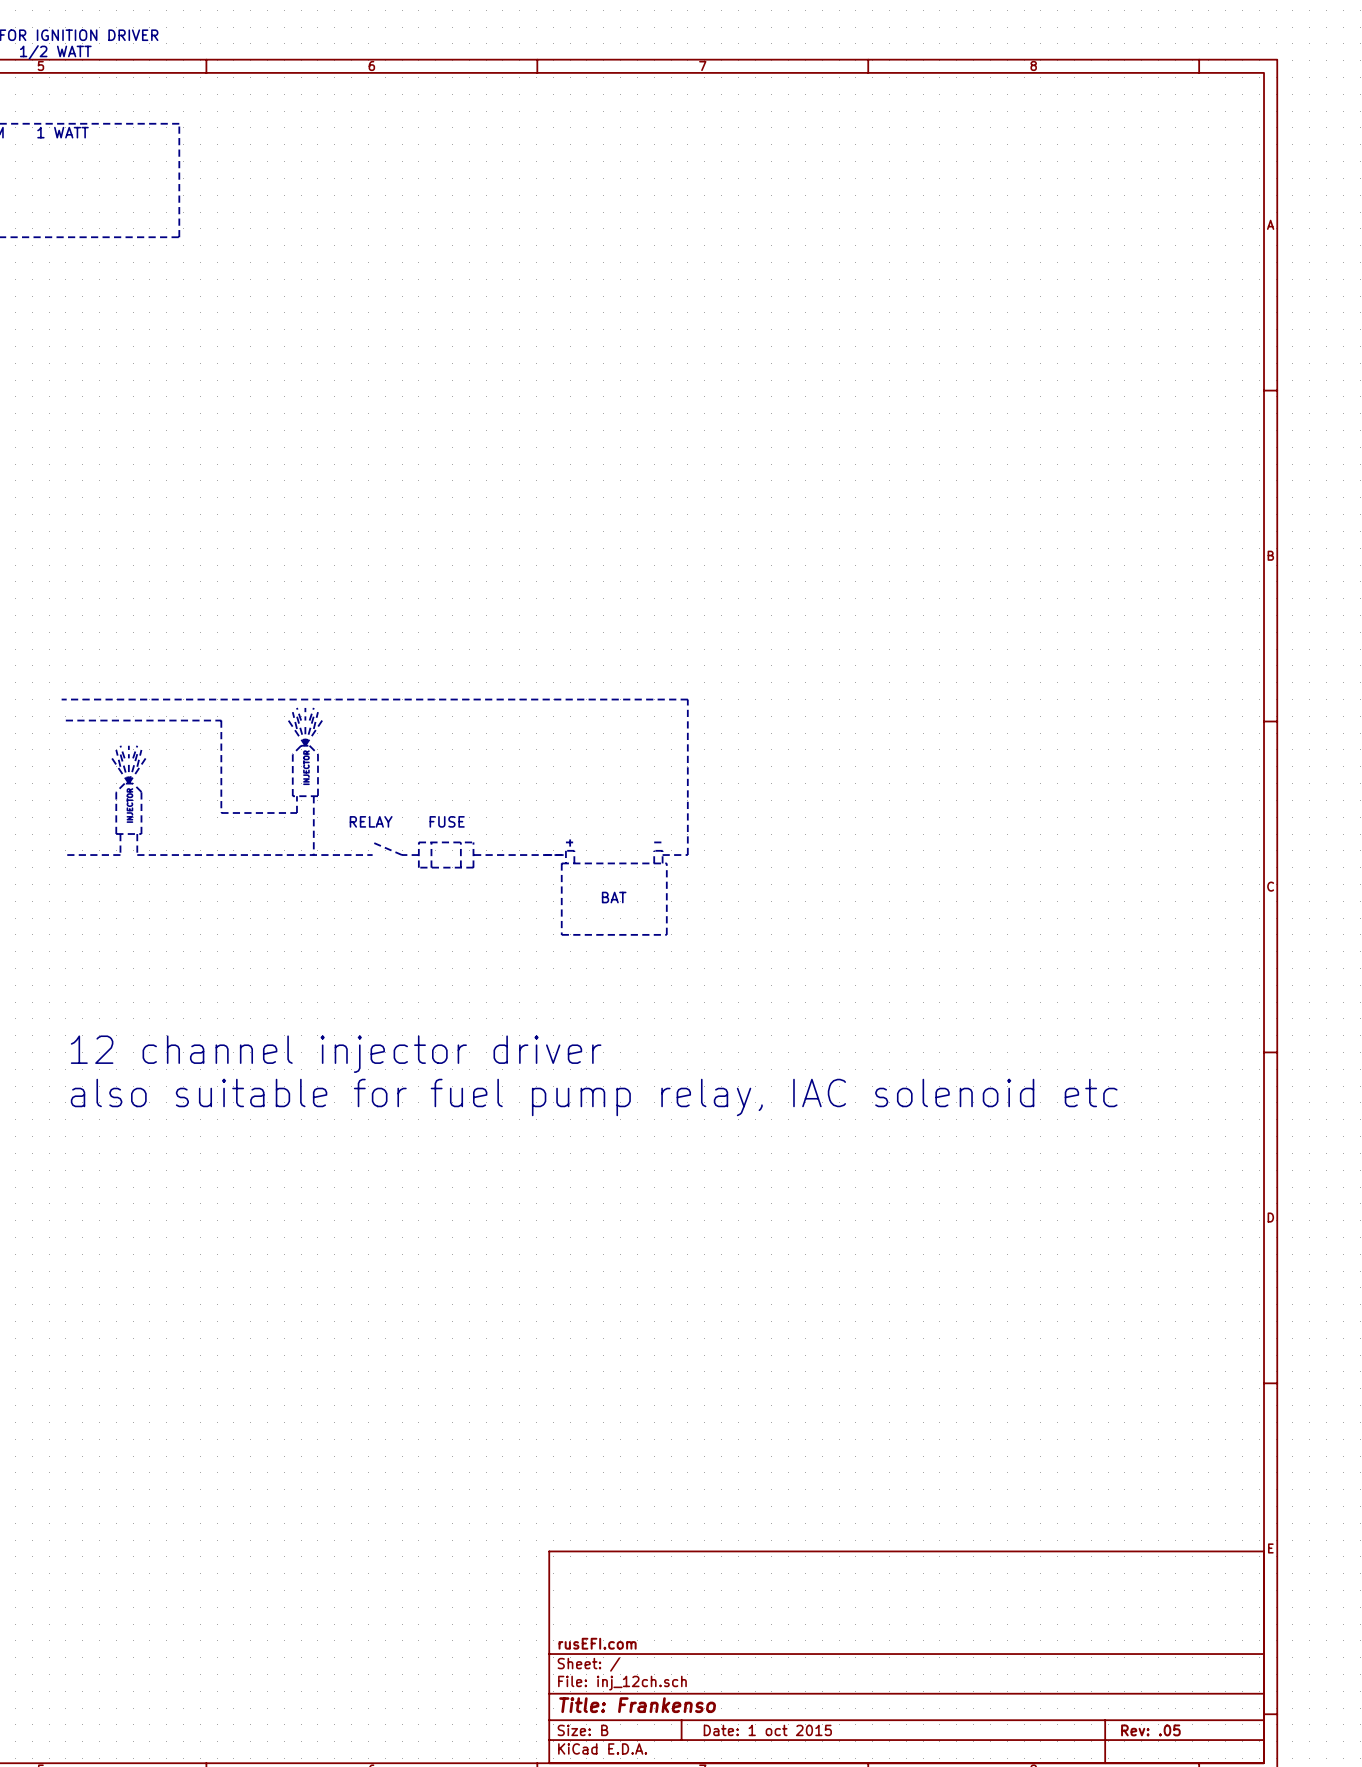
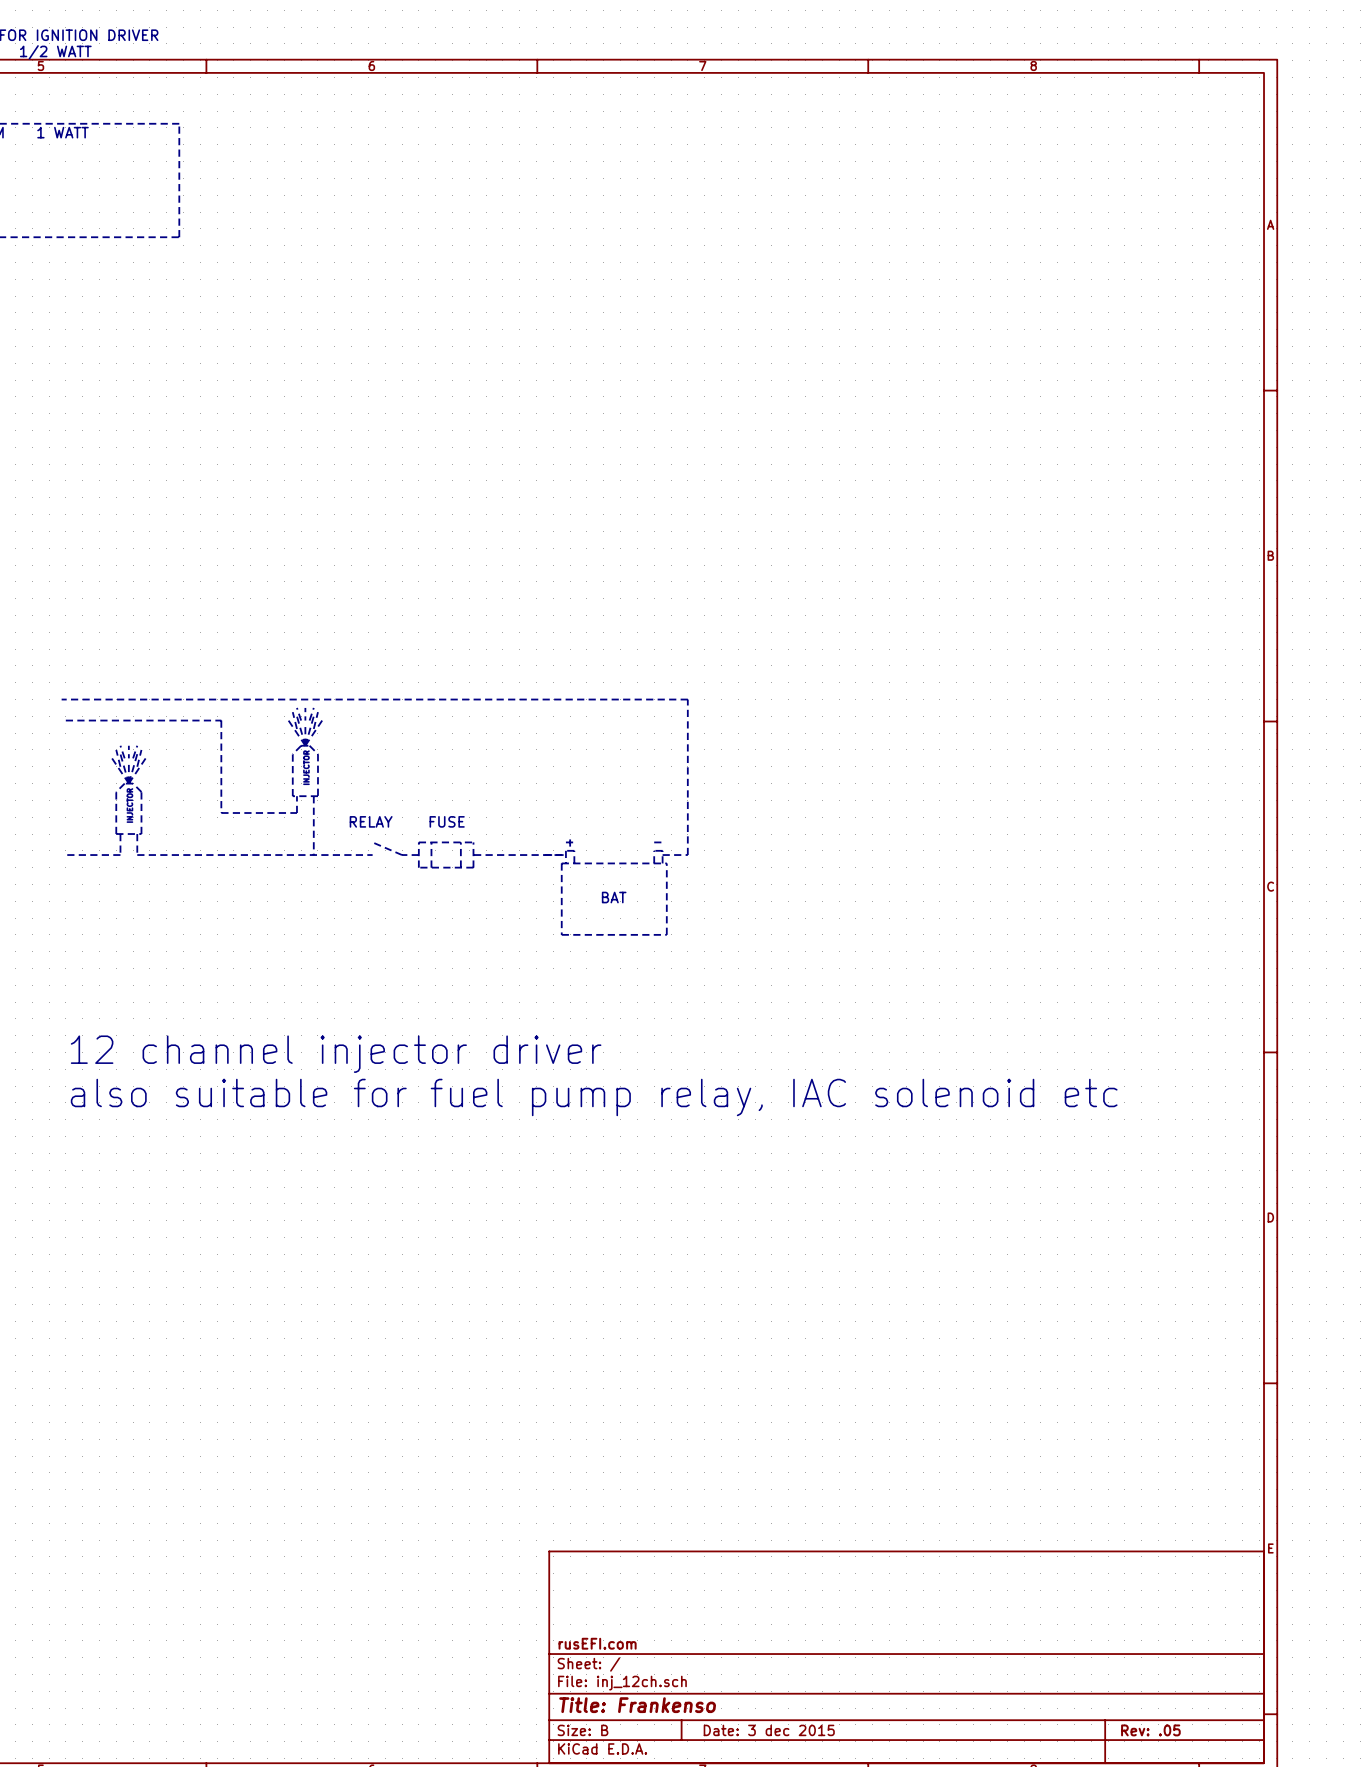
title block: Date: 1 oct 2015 (767, 1730) -> Date: 3 dec 2015 (769, 1730)

